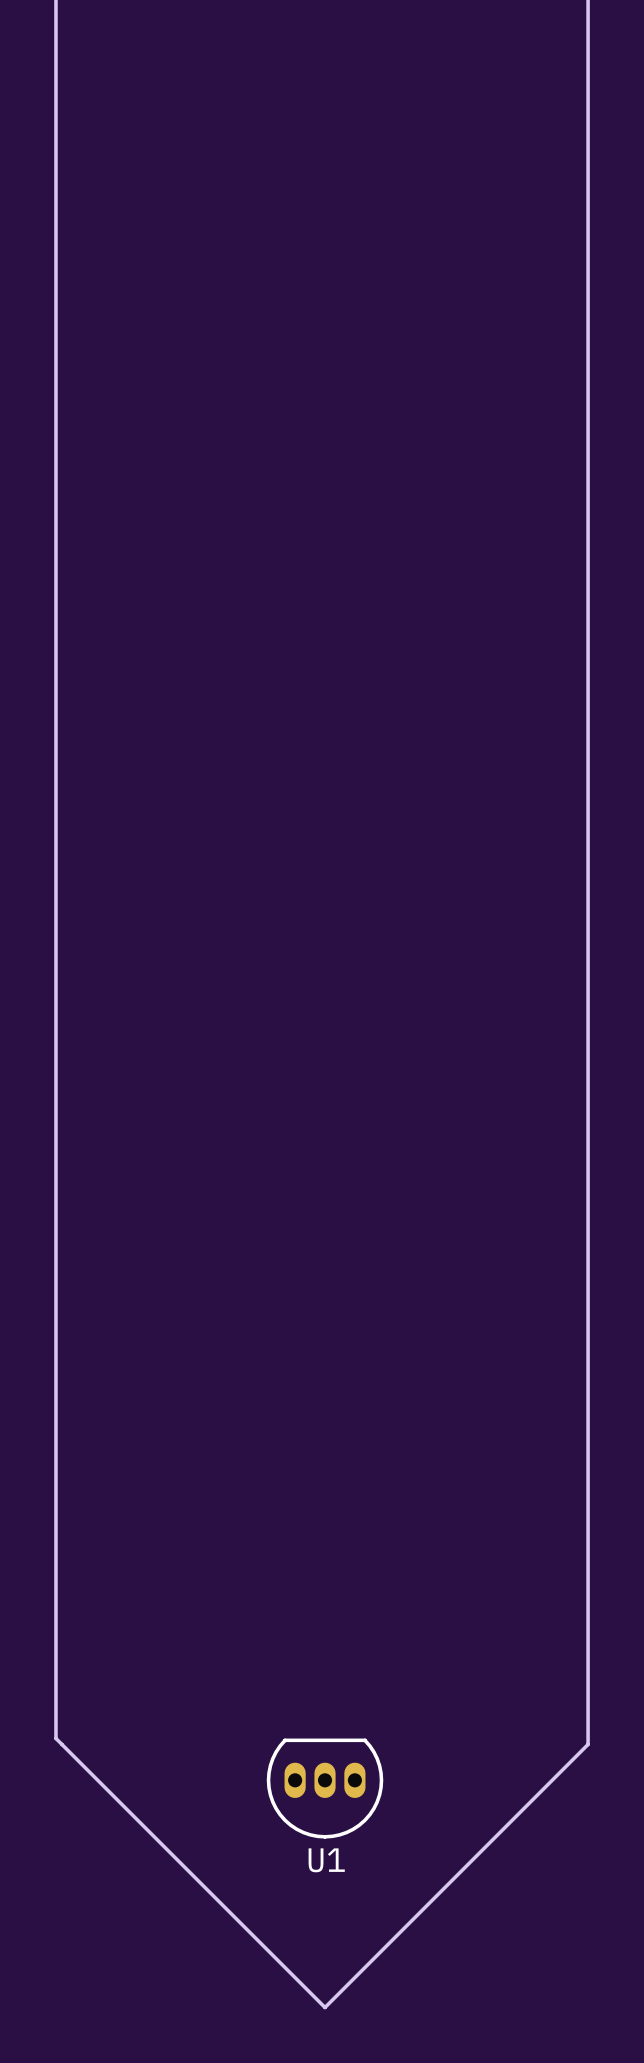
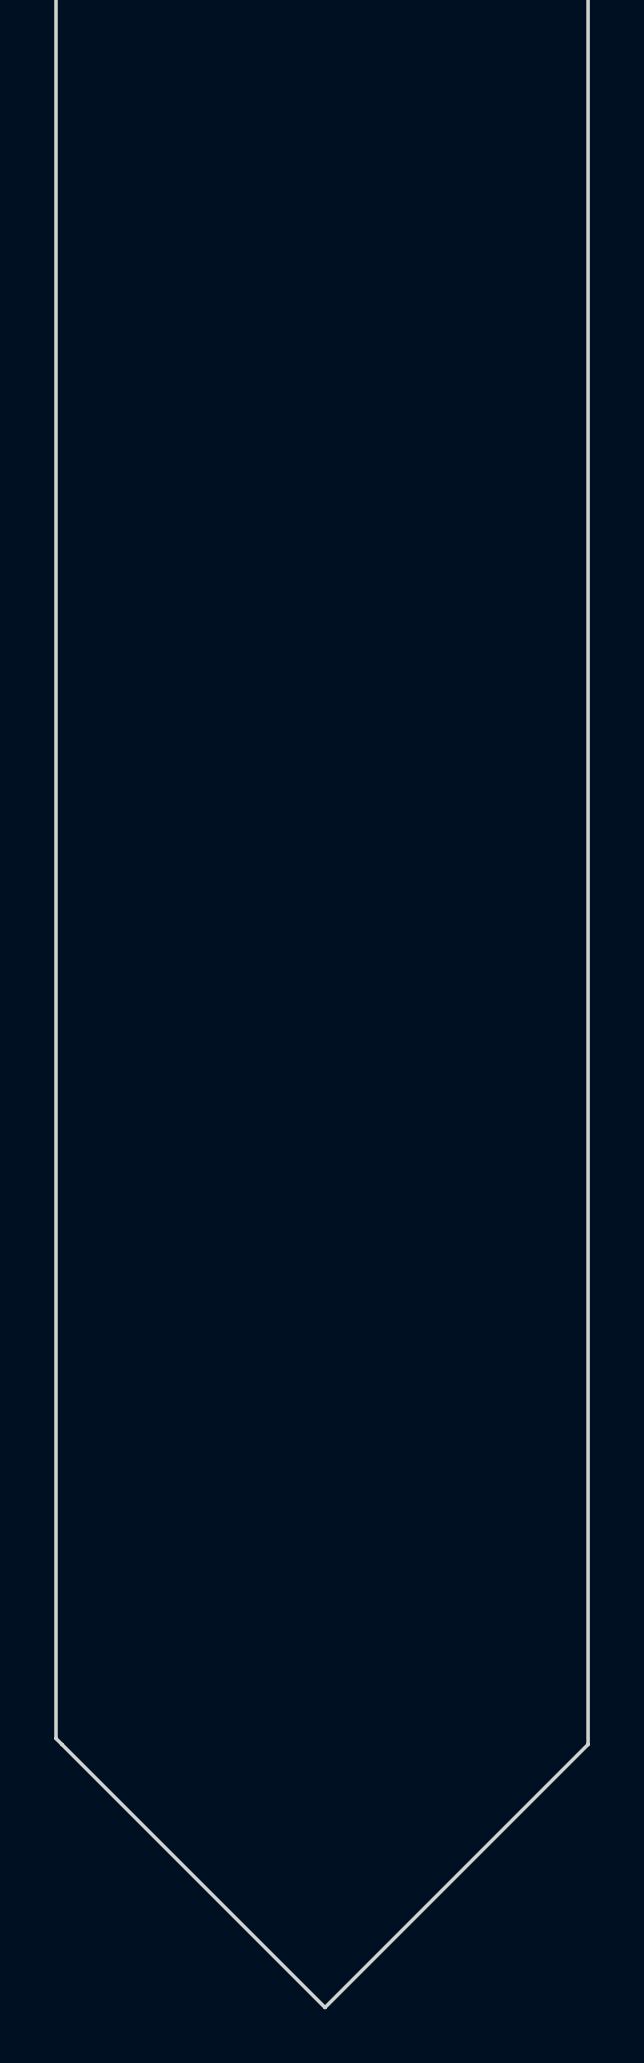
U1: (325, 1788) -> none

